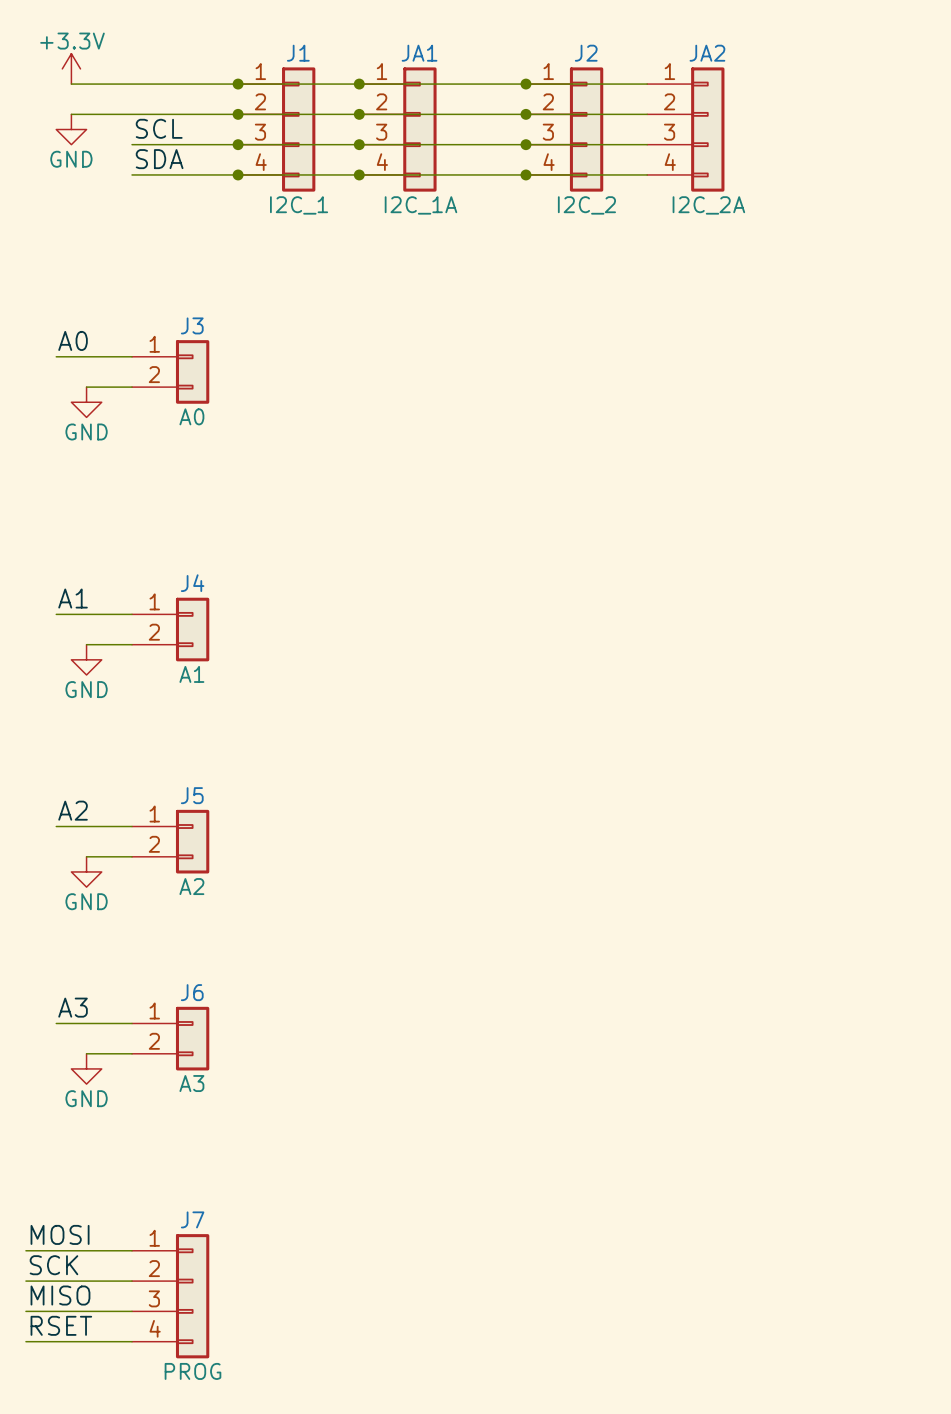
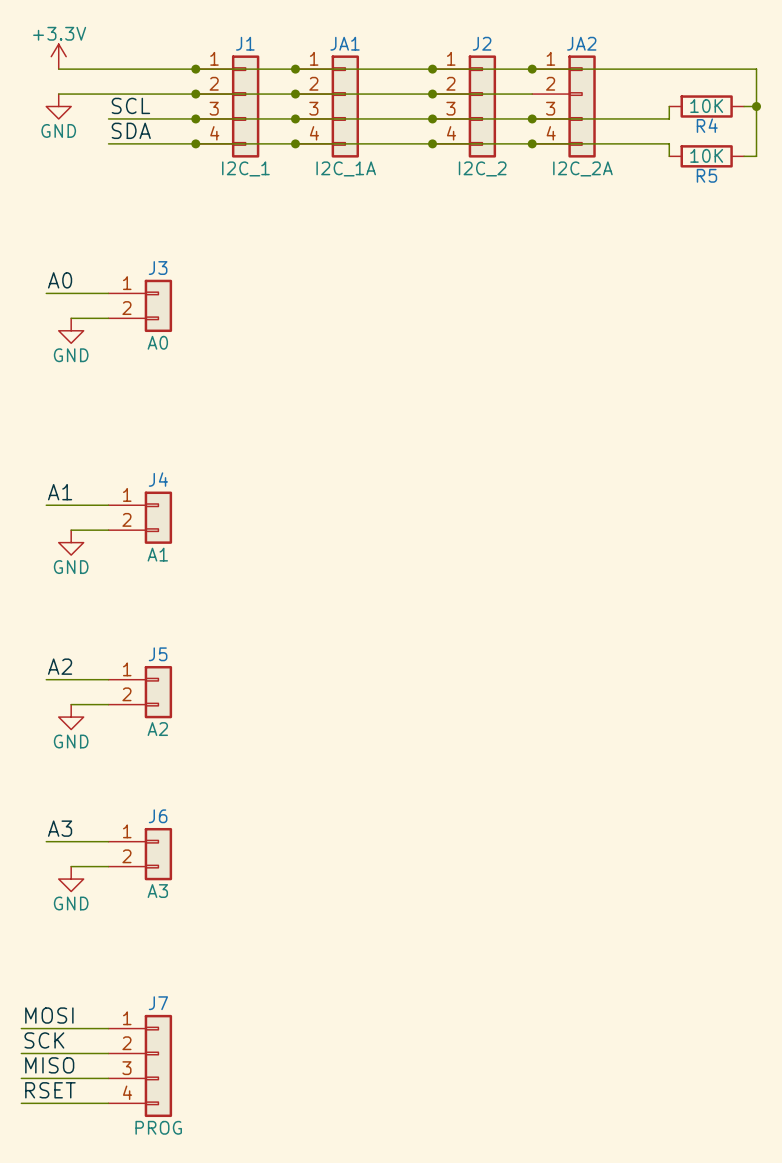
wire: none -> (532, 69) (756, 69) (756, 156) (744, 156)
junction: none -> (532, 69)
wire: none -> (669, 106) (669, 118) (532, 118)
R4: none -> 10K (706, 106)
wire: none -> (744, 106) (756, 106)
junction: none -> (756, 106)
junction: none -> (532, 118)
wire: none -> (532, 143) (669, 143) (669, 156)
junction: none -> (532, 143)
R5: none -> 10K (706, 156)

